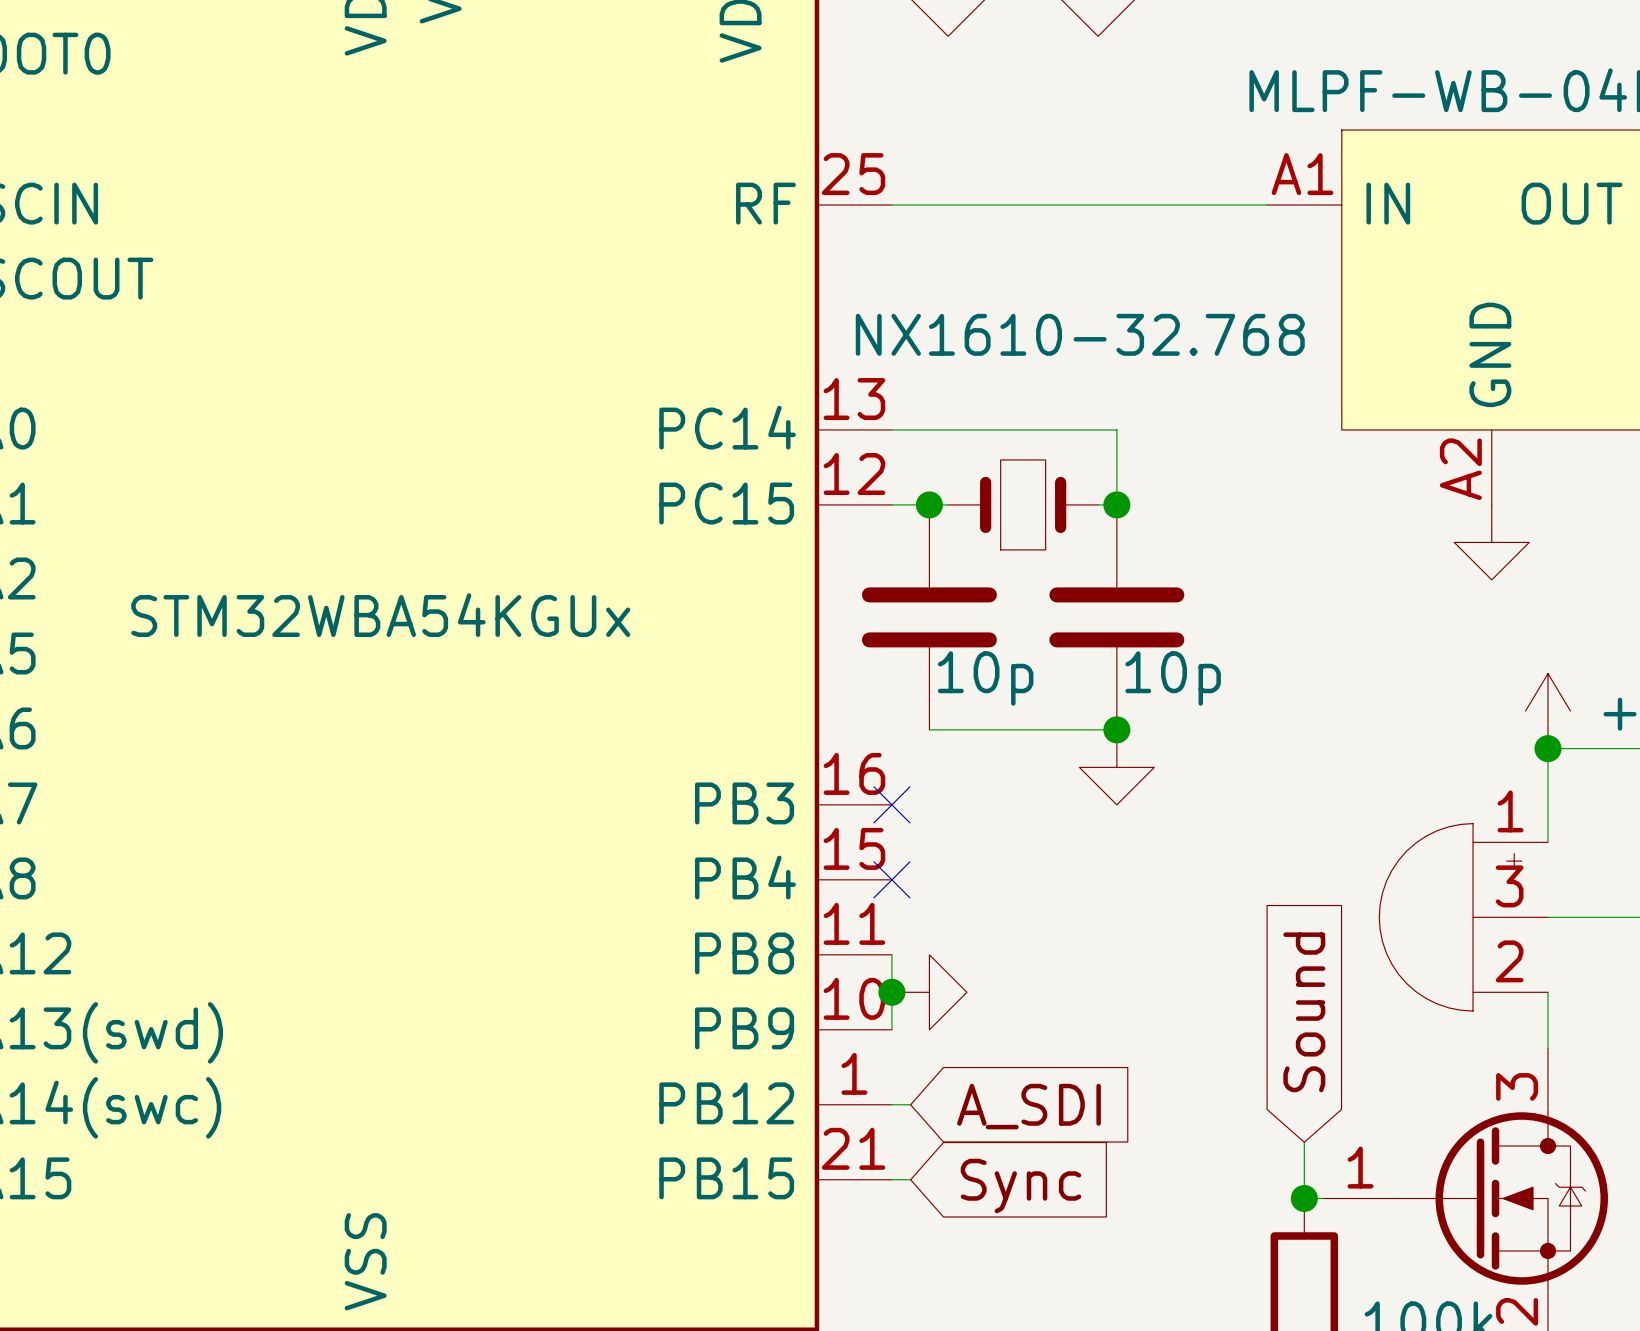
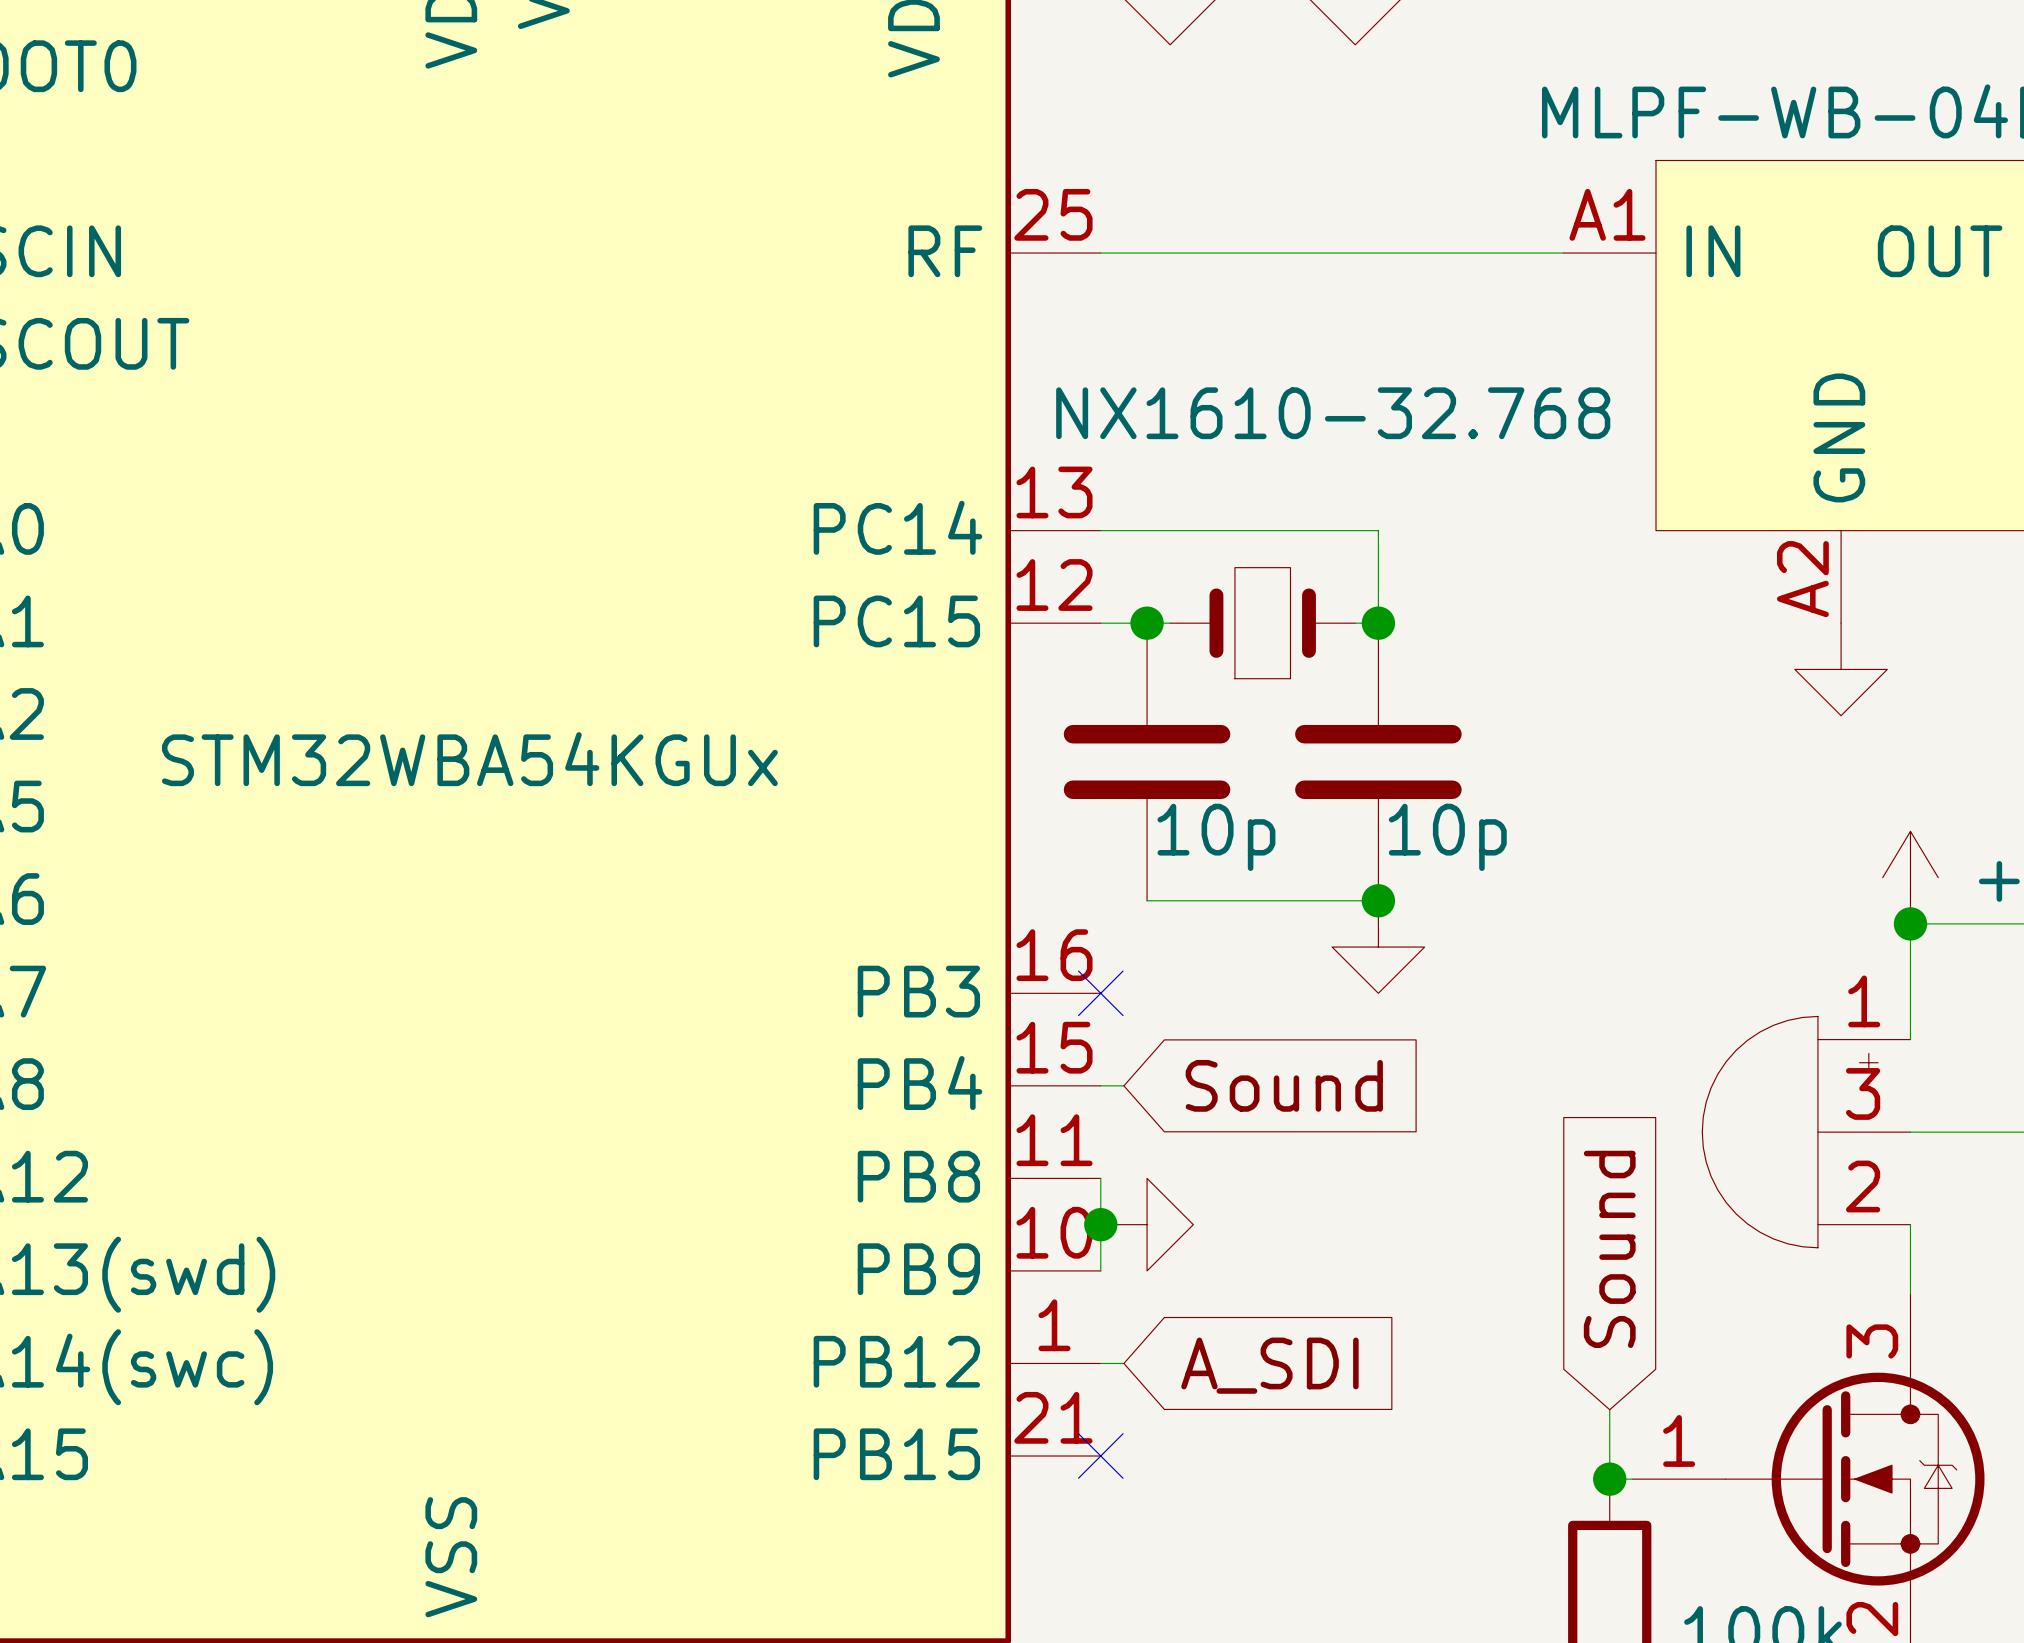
no-connect mark: (891, 879) -> none
global label: none -> Sound (1284, 1085)
wire: (891, 1179) (910, 1179) -> (1100, 1085) (1123, 1085)
no-connect mark: none -> (1100, 1456)
global label: Sync (1020, 1186) -> none

